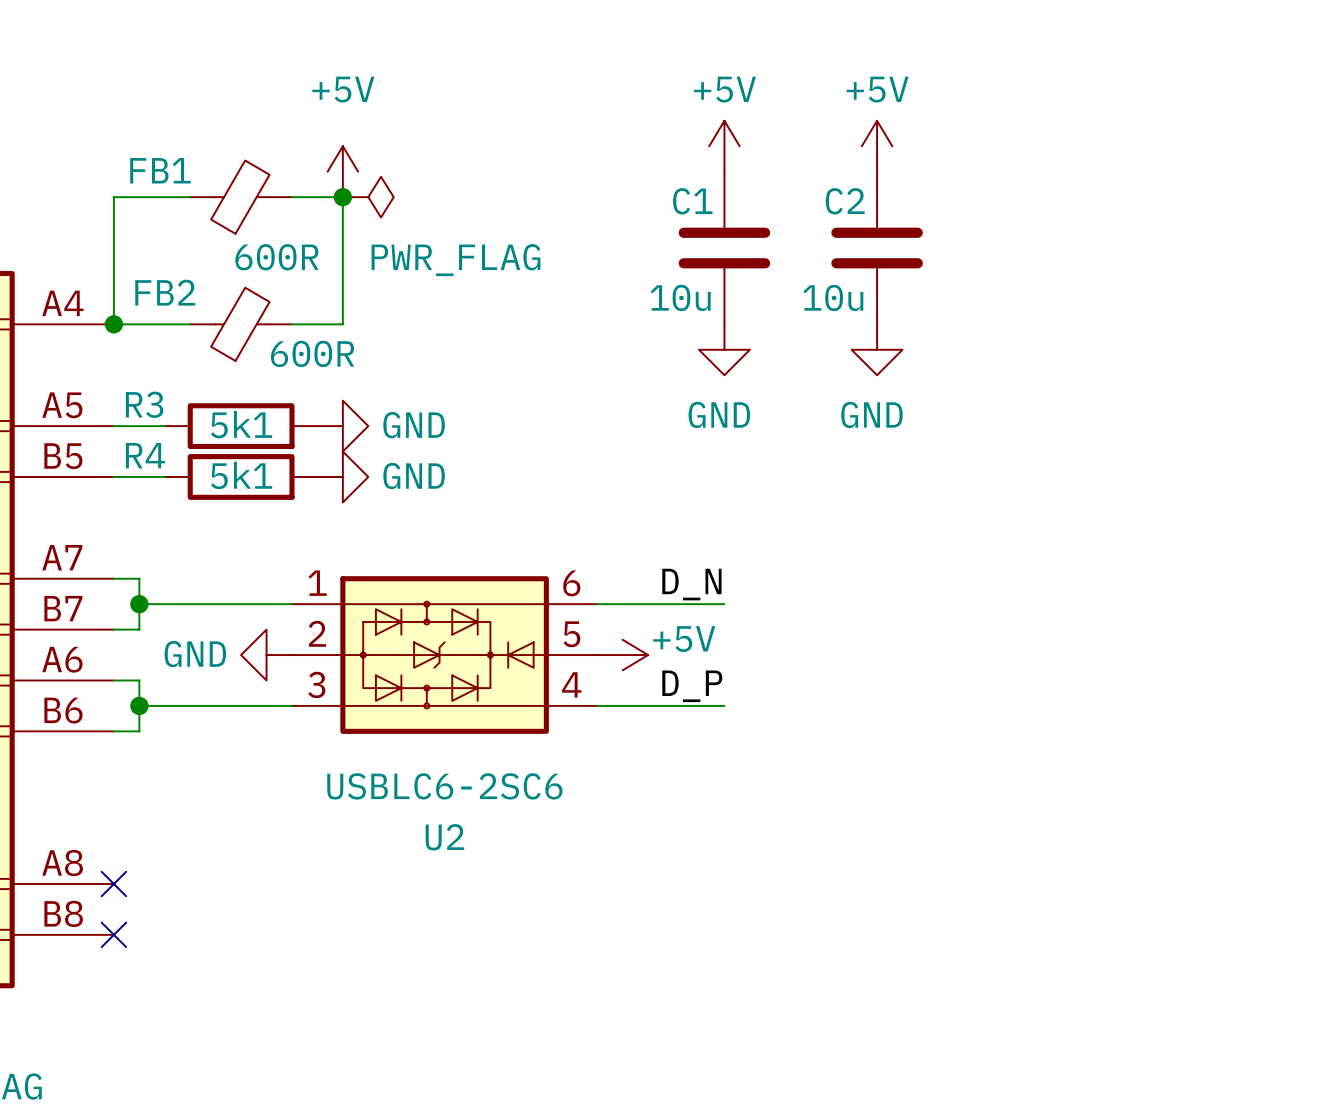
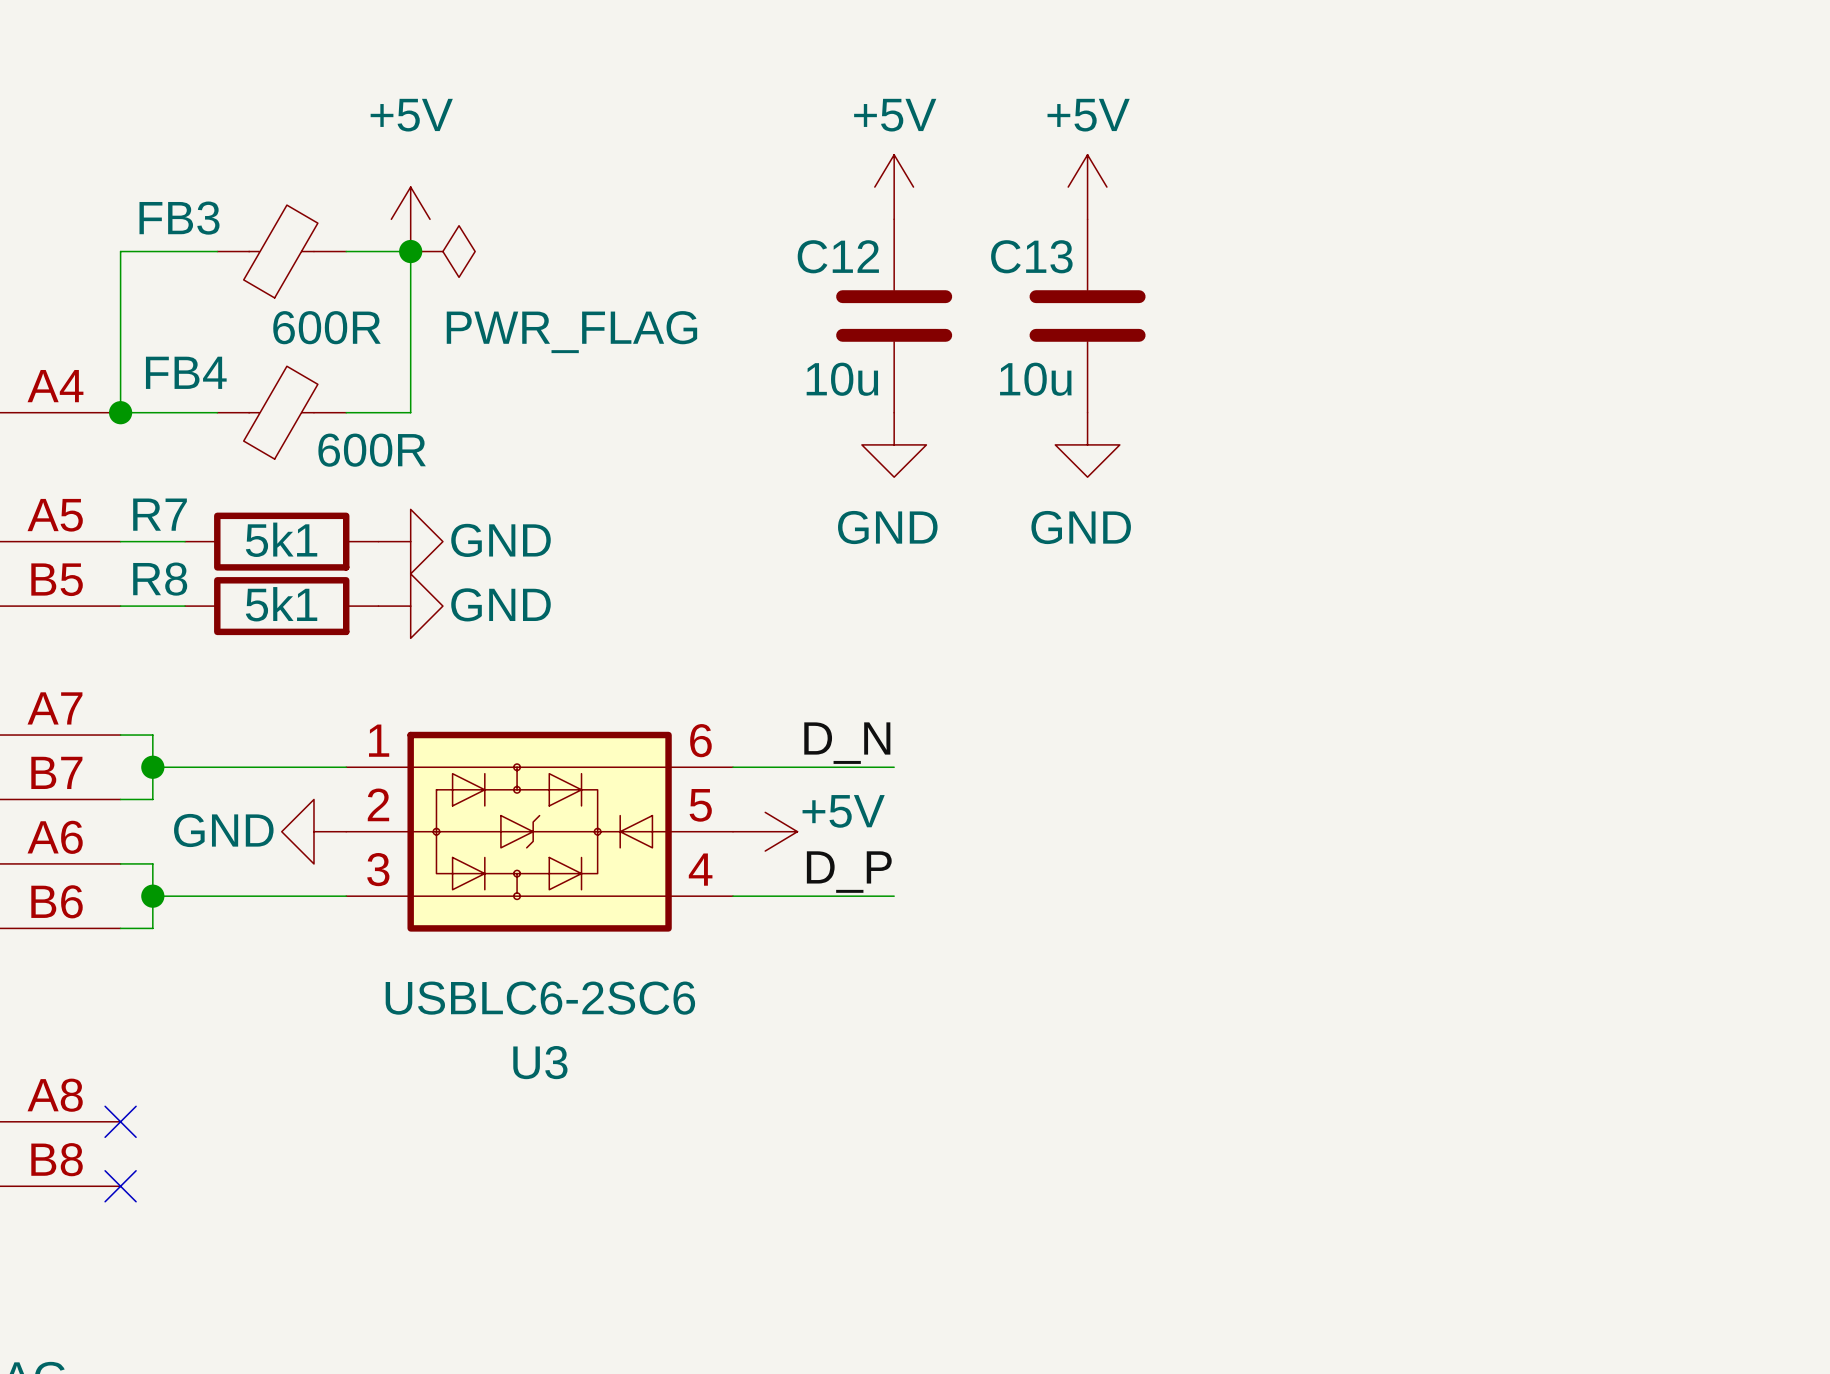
FB1 name: FB1 (160, 170) -> FB3 (179, 218)
C1 name: C1 (692, 201) -> C12 (838, 256)
C2 name: C2 (845, 201) -> C13 (1031, 256)
FB2 name: FB2 (165, 292) -> FB4 (186, 372)
R3 name: R3 (144, 404) -> R7 (160, 514)
R4 name: R4 (145, 455) -> R8 (160, 579)
U2 name: U2 (444, 837) -> U3 (540, 1062)

